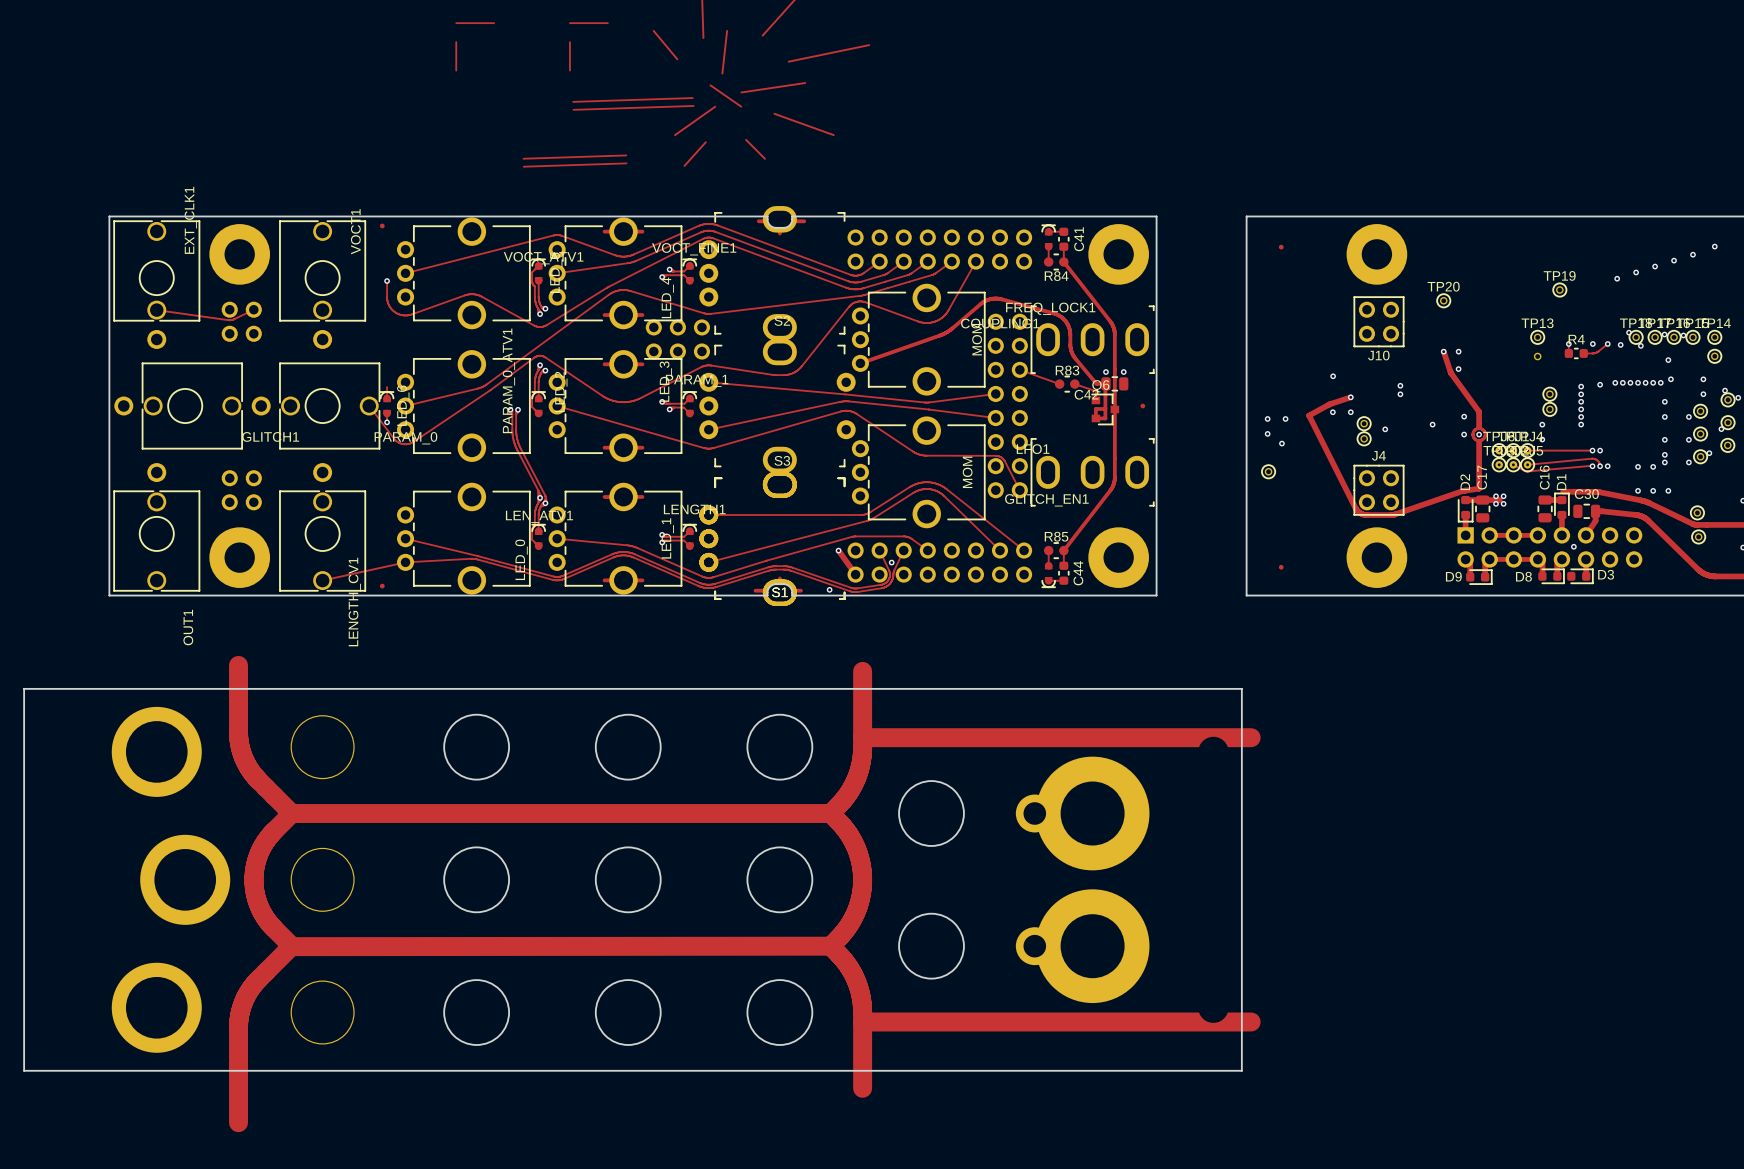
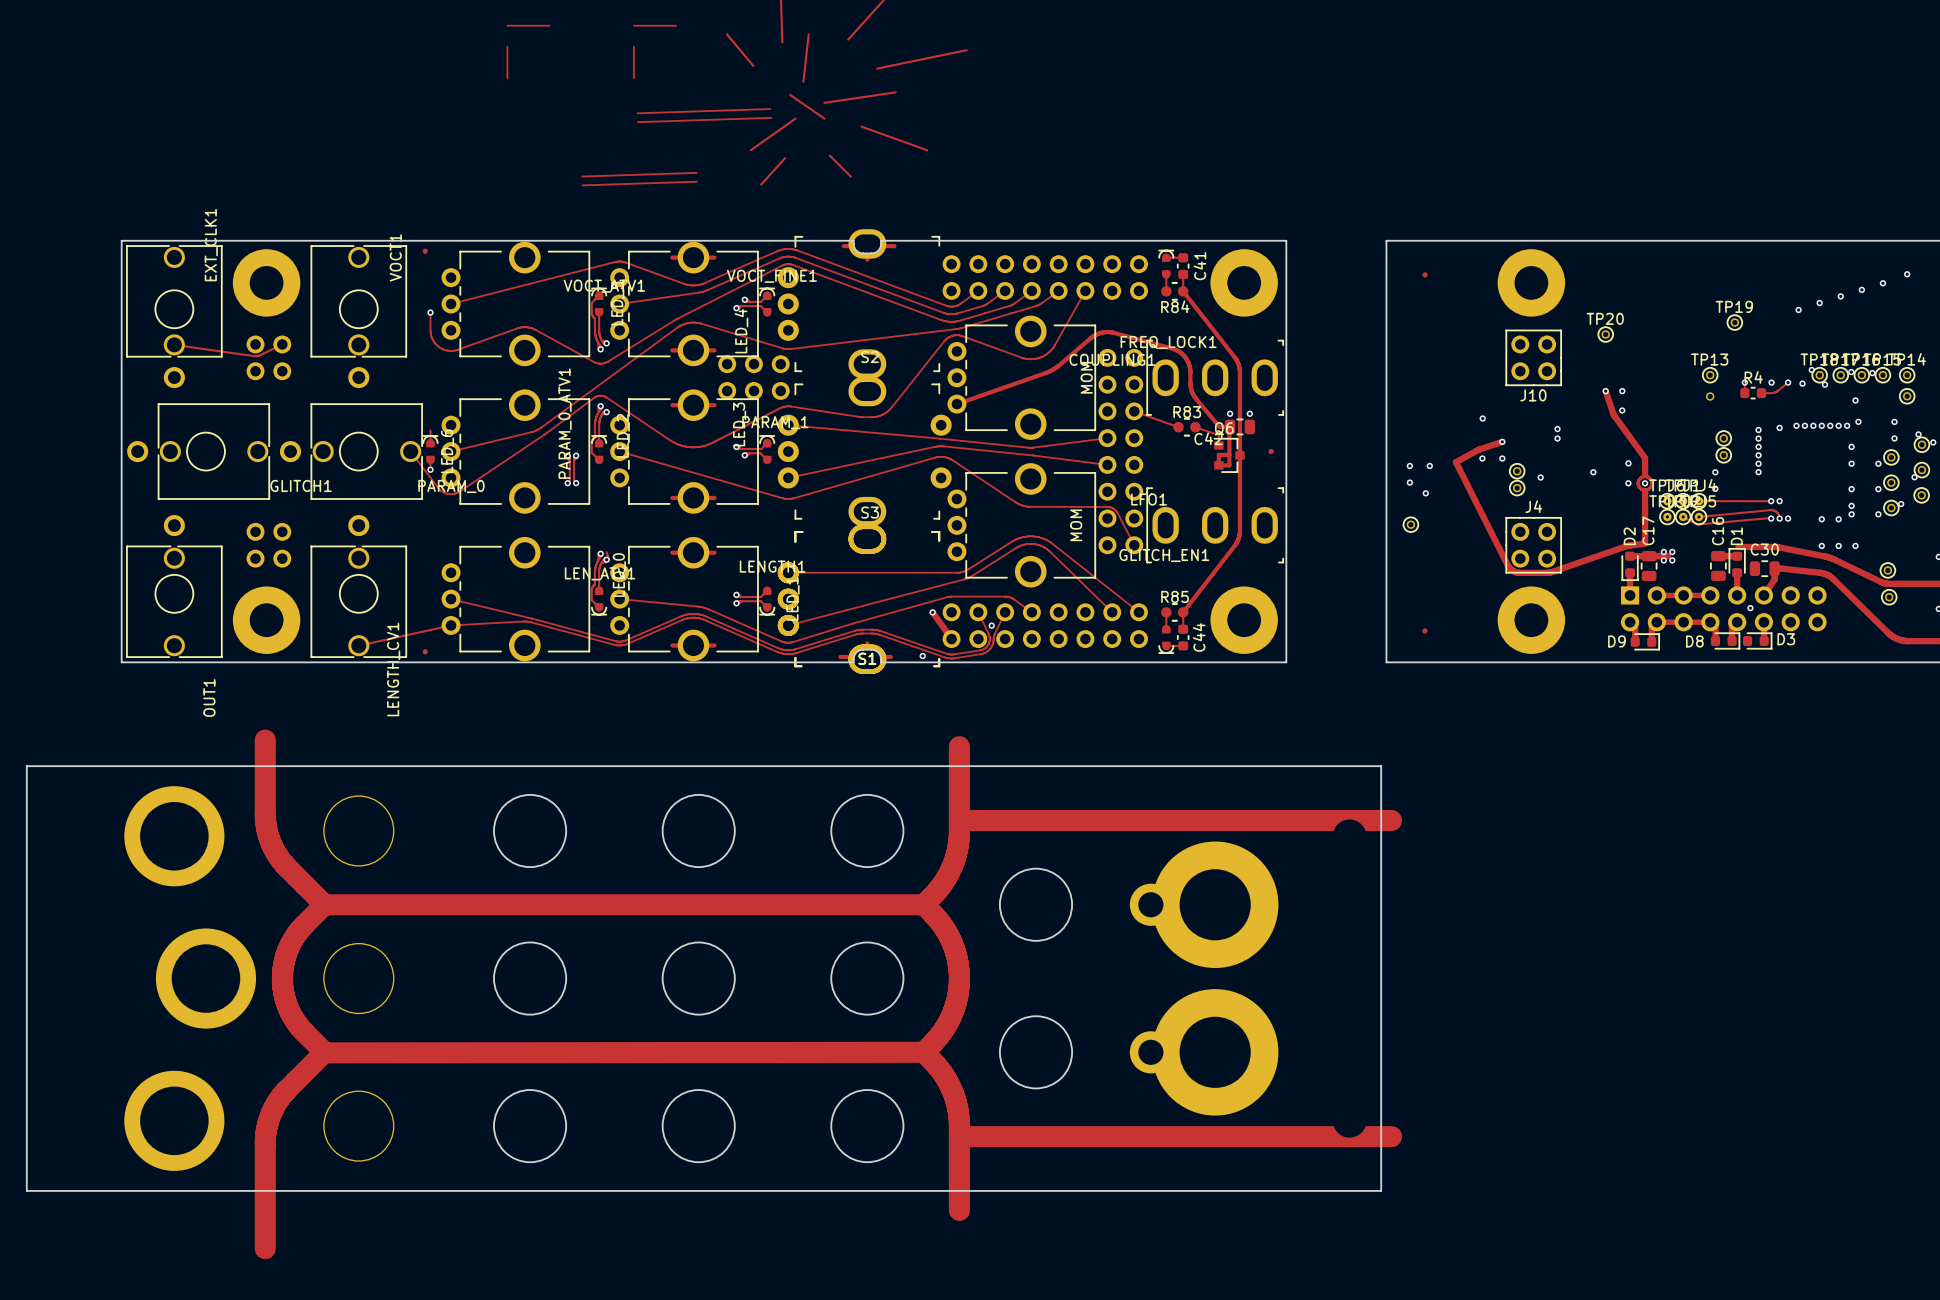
track: (512, 429) (515, 447) (541, 497) -> (569, 477) (569, 483)
track: (516, 429) (519, 445) (545, 495) (544, 501) -> (574, 477) (574, 483)
via: none -> (567, 483)
via: none -> (576, 483)
track: (538, 497) (538, 490) (540, 497) -> none
LED_0 rotation: 0° (538, 537) -> 180° (599, 600)
LED_1 rotation: 0° (689, 537) -> 180° (767, 600)

